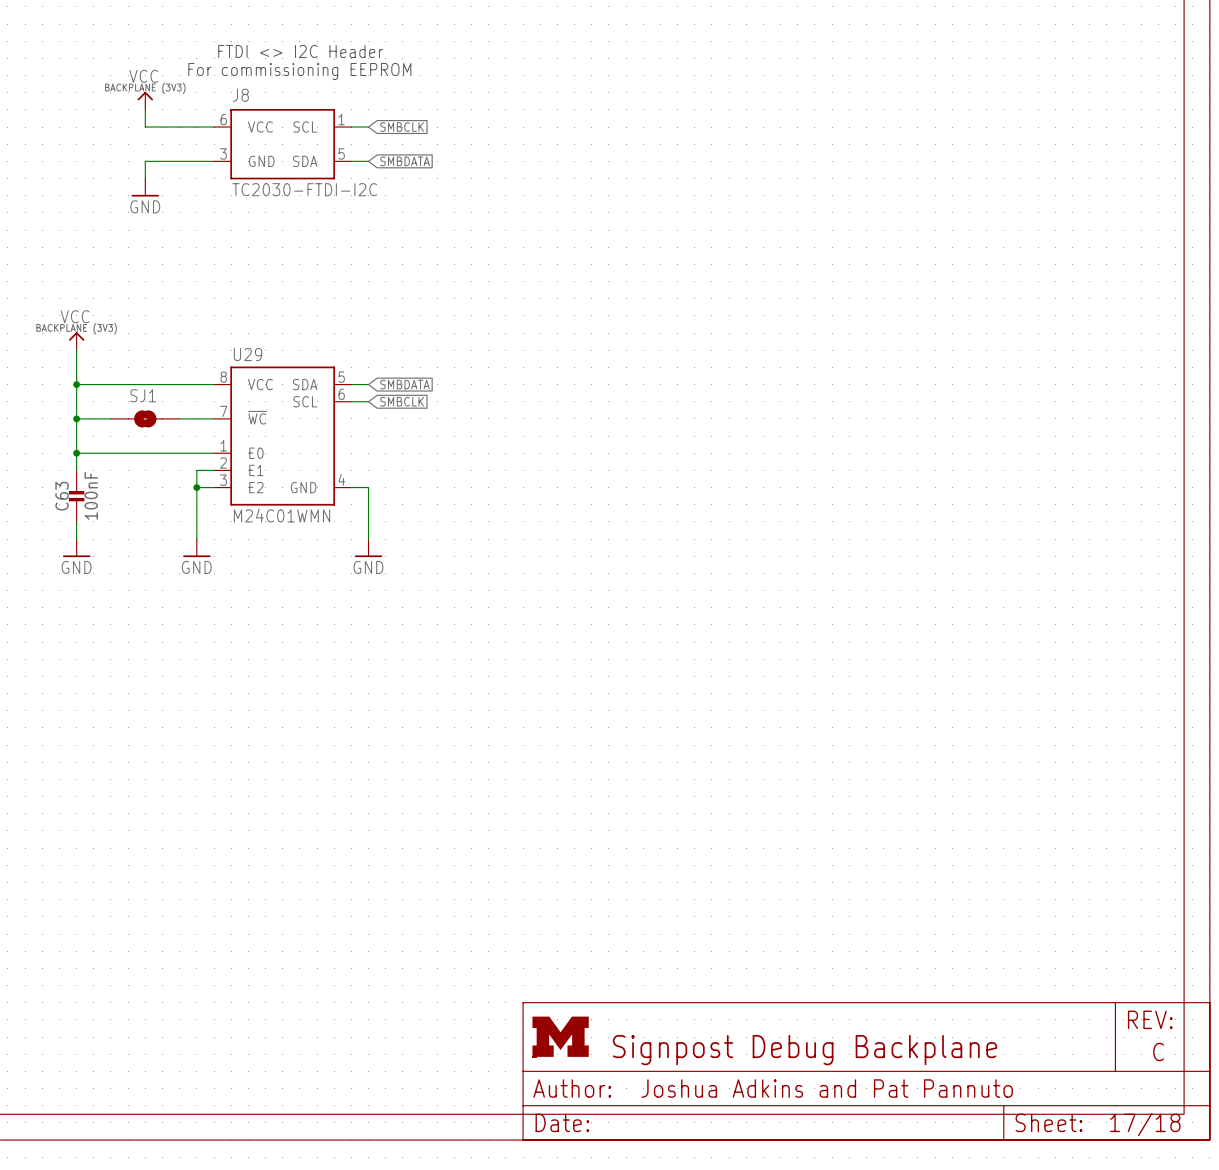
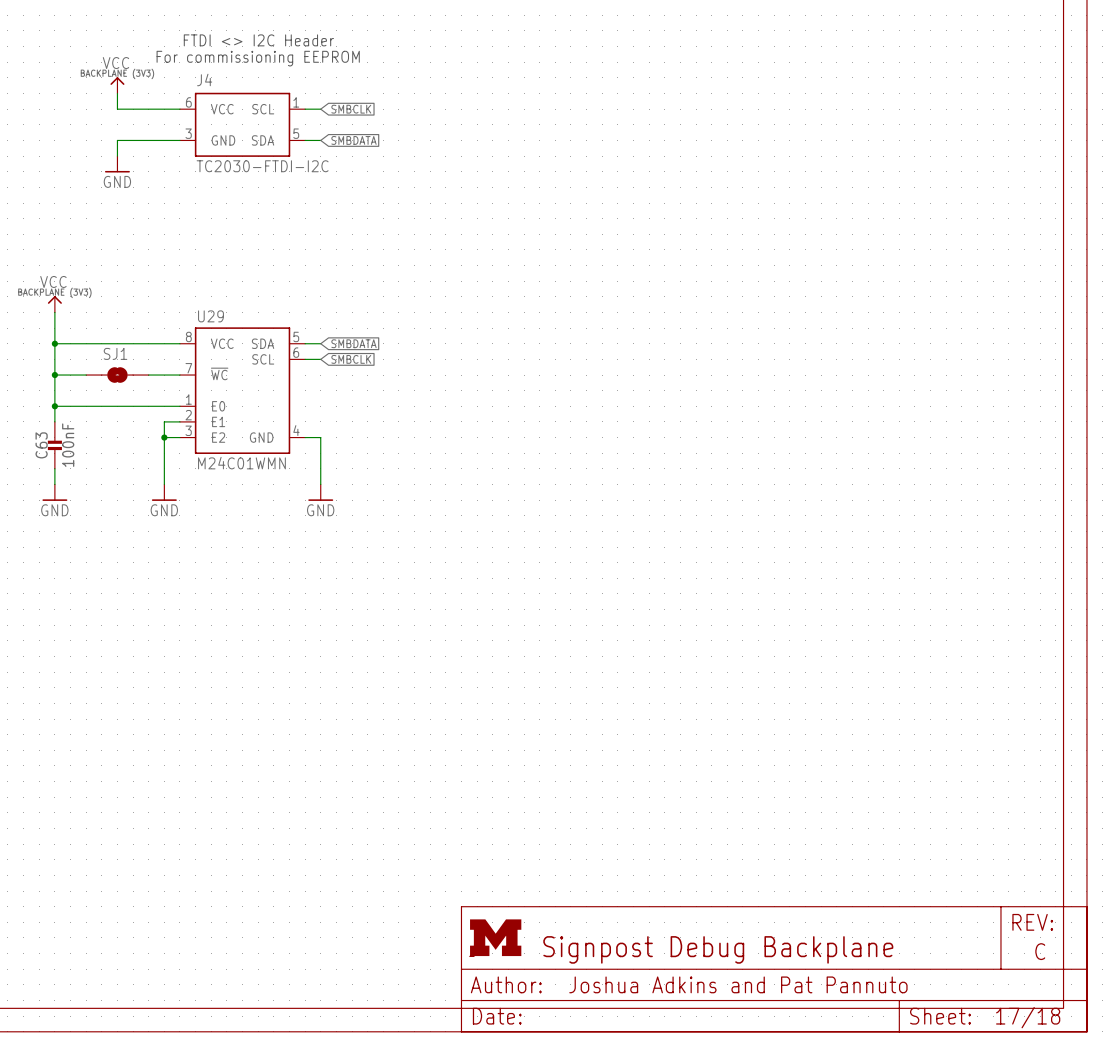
J8 name: J8 (240, 95) -> J4 (204, 79)

